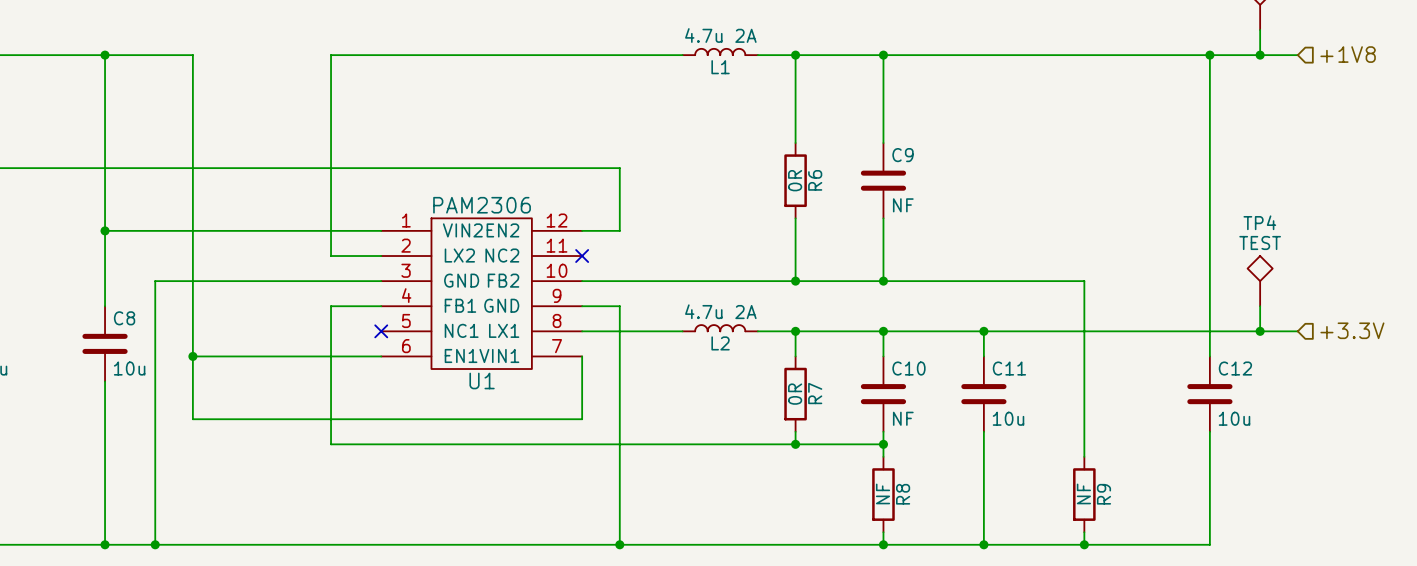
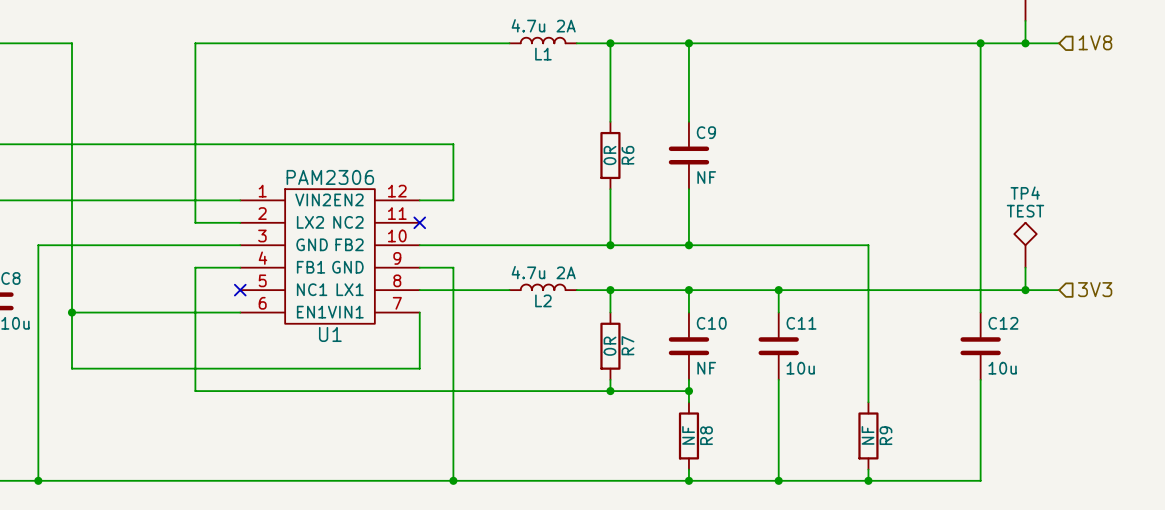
hierarchical label: +1V8 (1348, 54) -> 1V8 (1095, 42)
hierarchical label: +3.3V (1352, 330) -> 3V3 (1095, 289)

